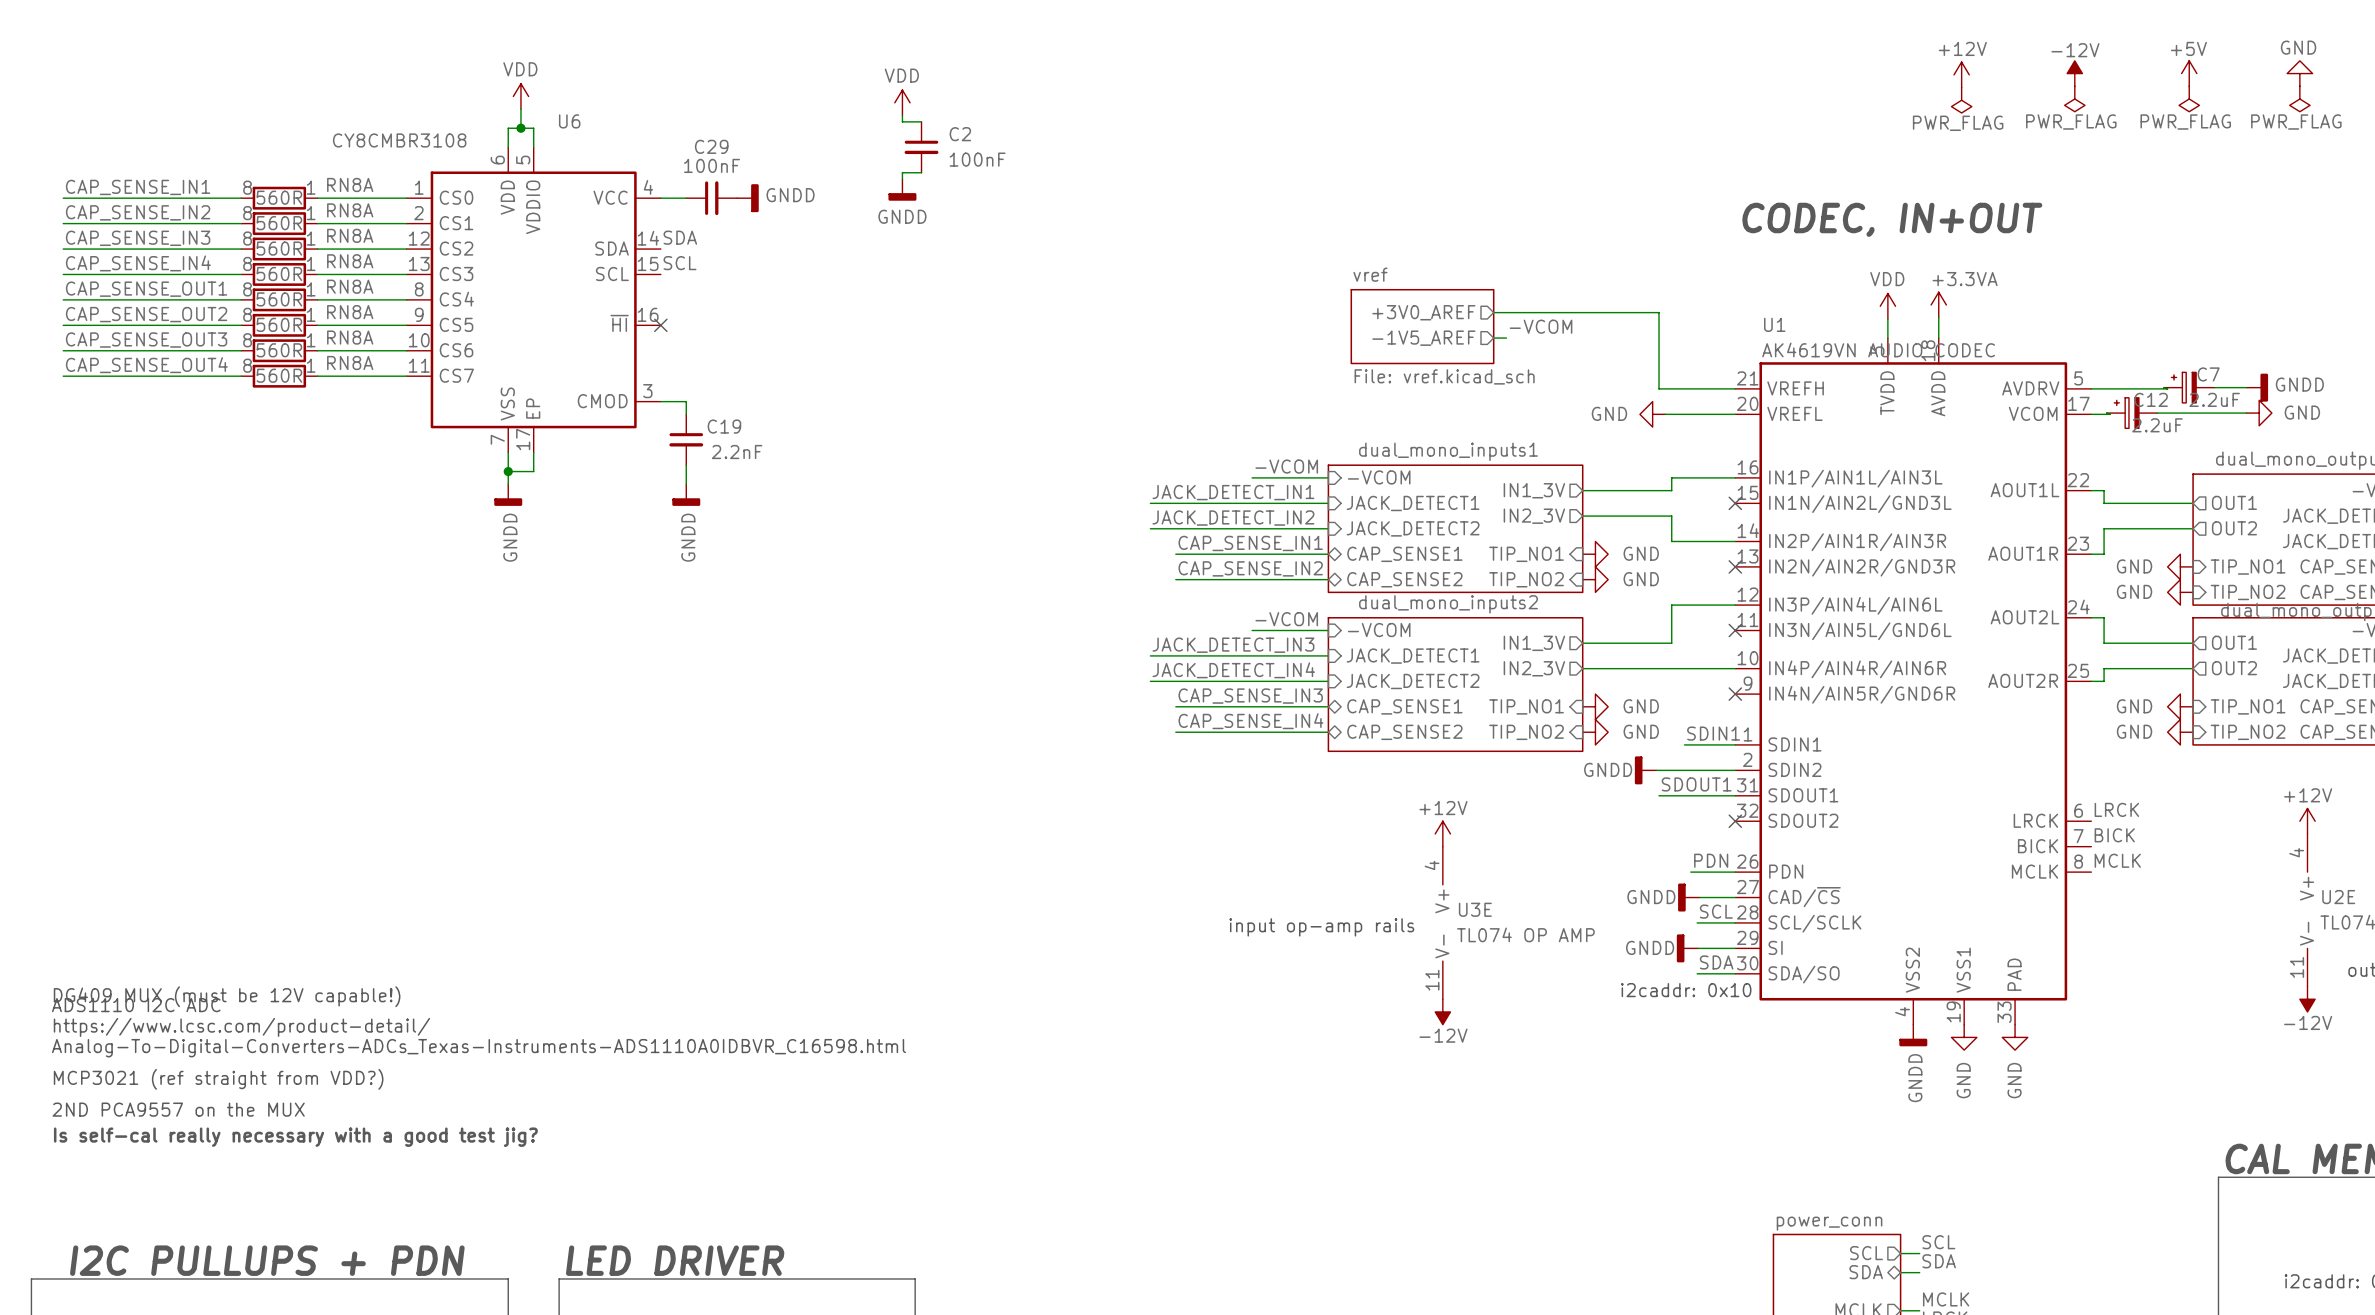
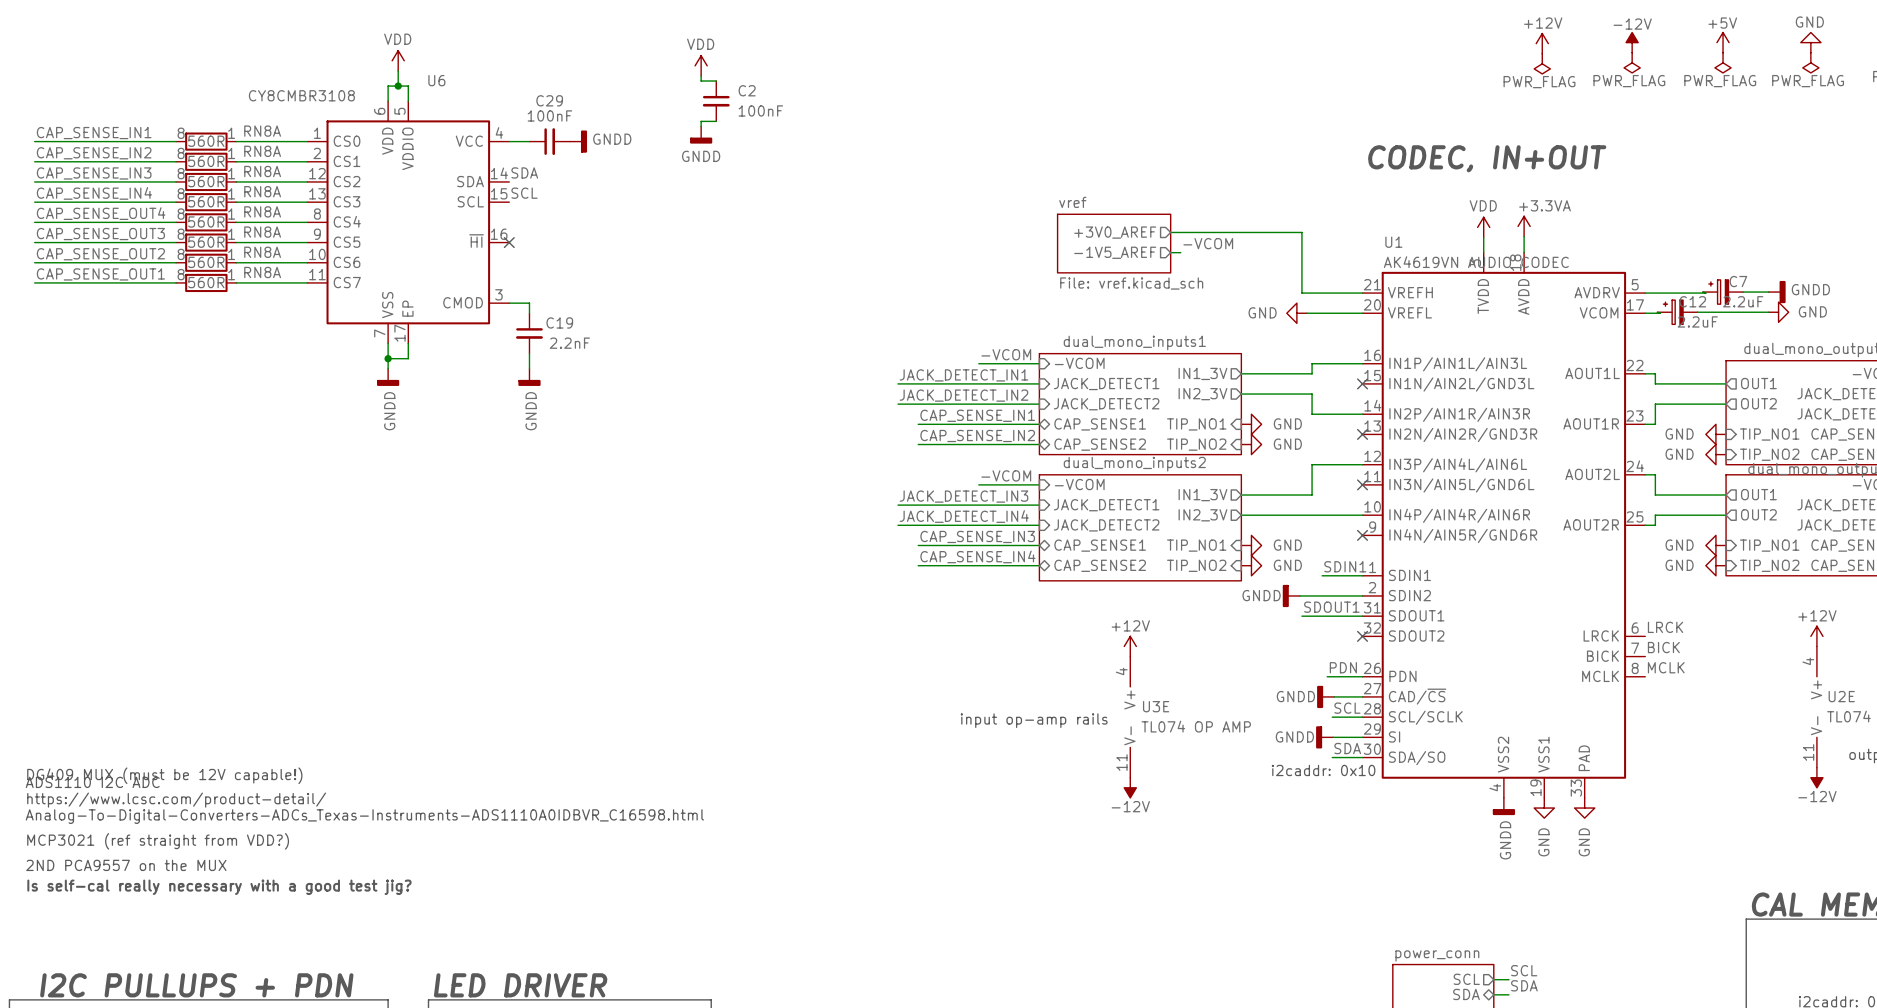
label: CAP_SENSE_OUT1 (146, 289) -> CAP_SENSE_OUT4 (101, 213)
label: CAP_SENSE_OUT2 (146, 314) -> CAP_SENSE_OUT3 (100, 234)
label: CAP_SENSE_OUT3 (146, 340) -> CAP_SENSE_OUT2 (100, 254)
label: CAP_SENSE_OUT4 (146, 365) -> CAP_SENSE_OUT1 (100, 274)

